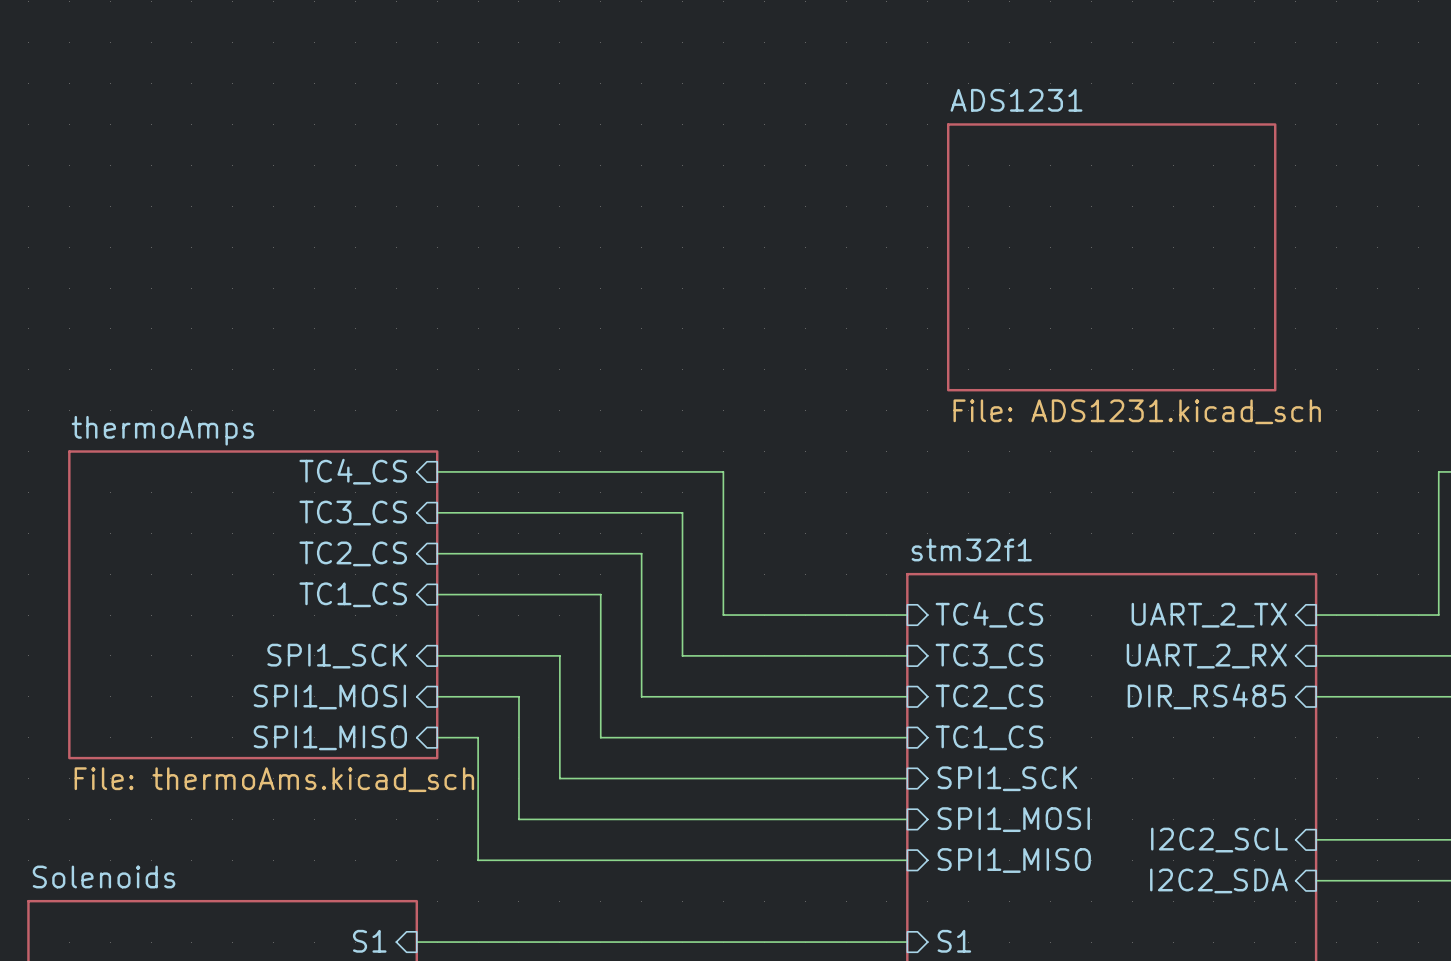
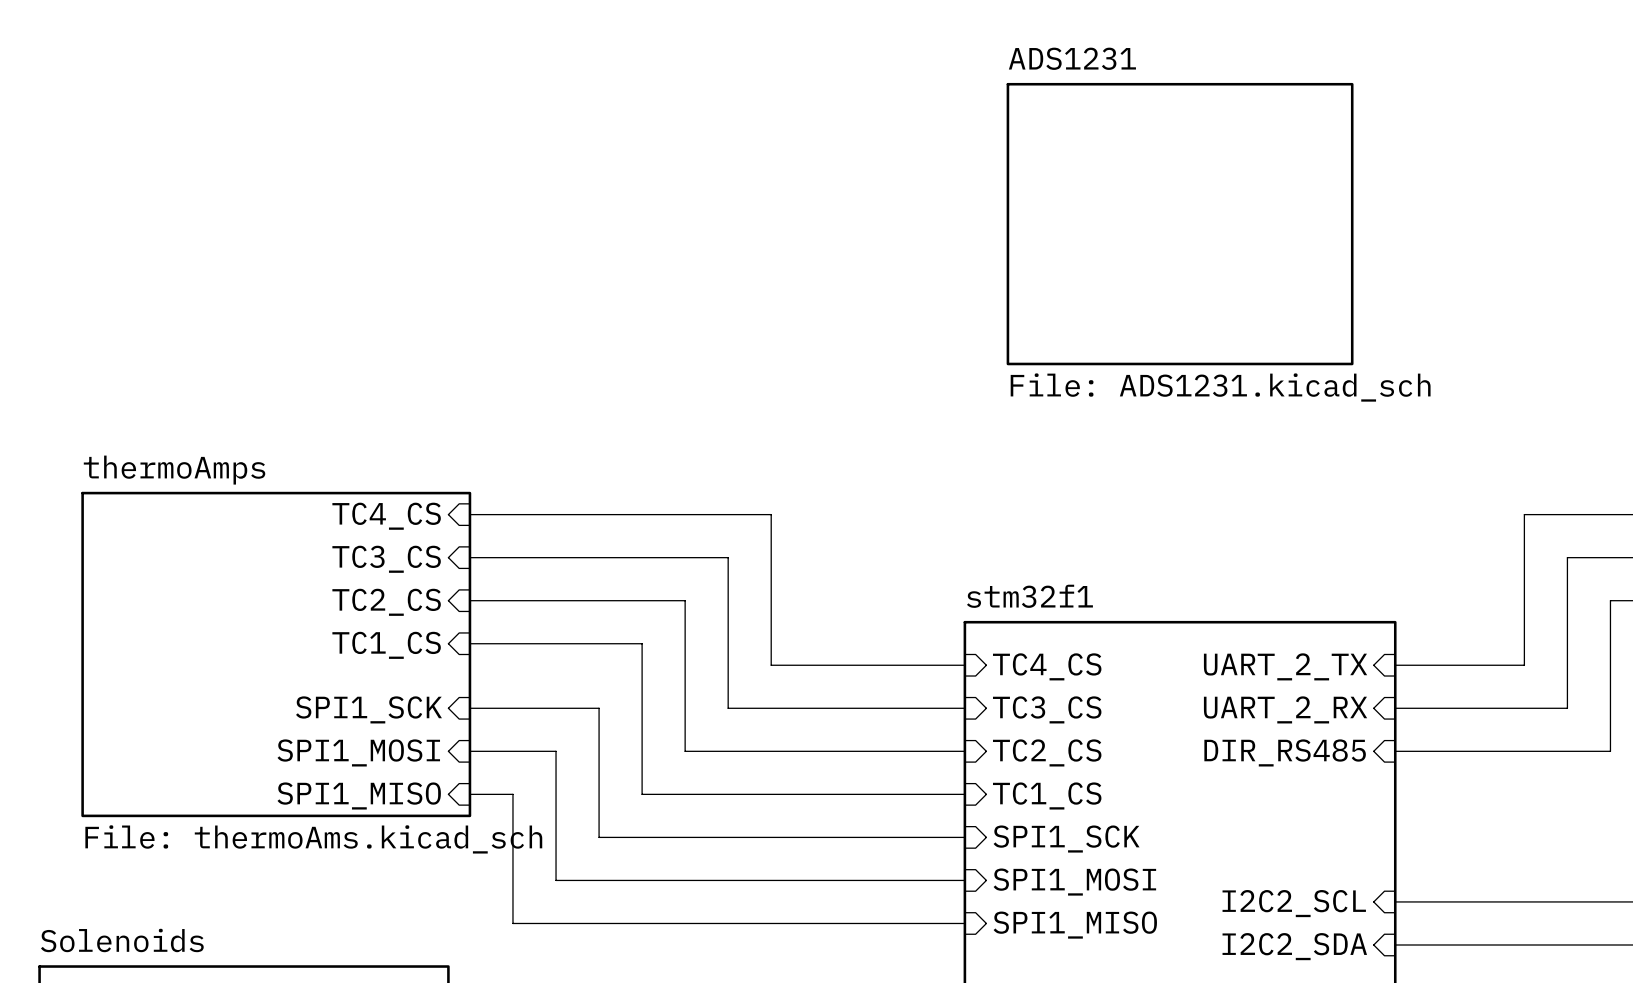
sheet ADS1231 position: (1111, 257) -> (1180, 224)

